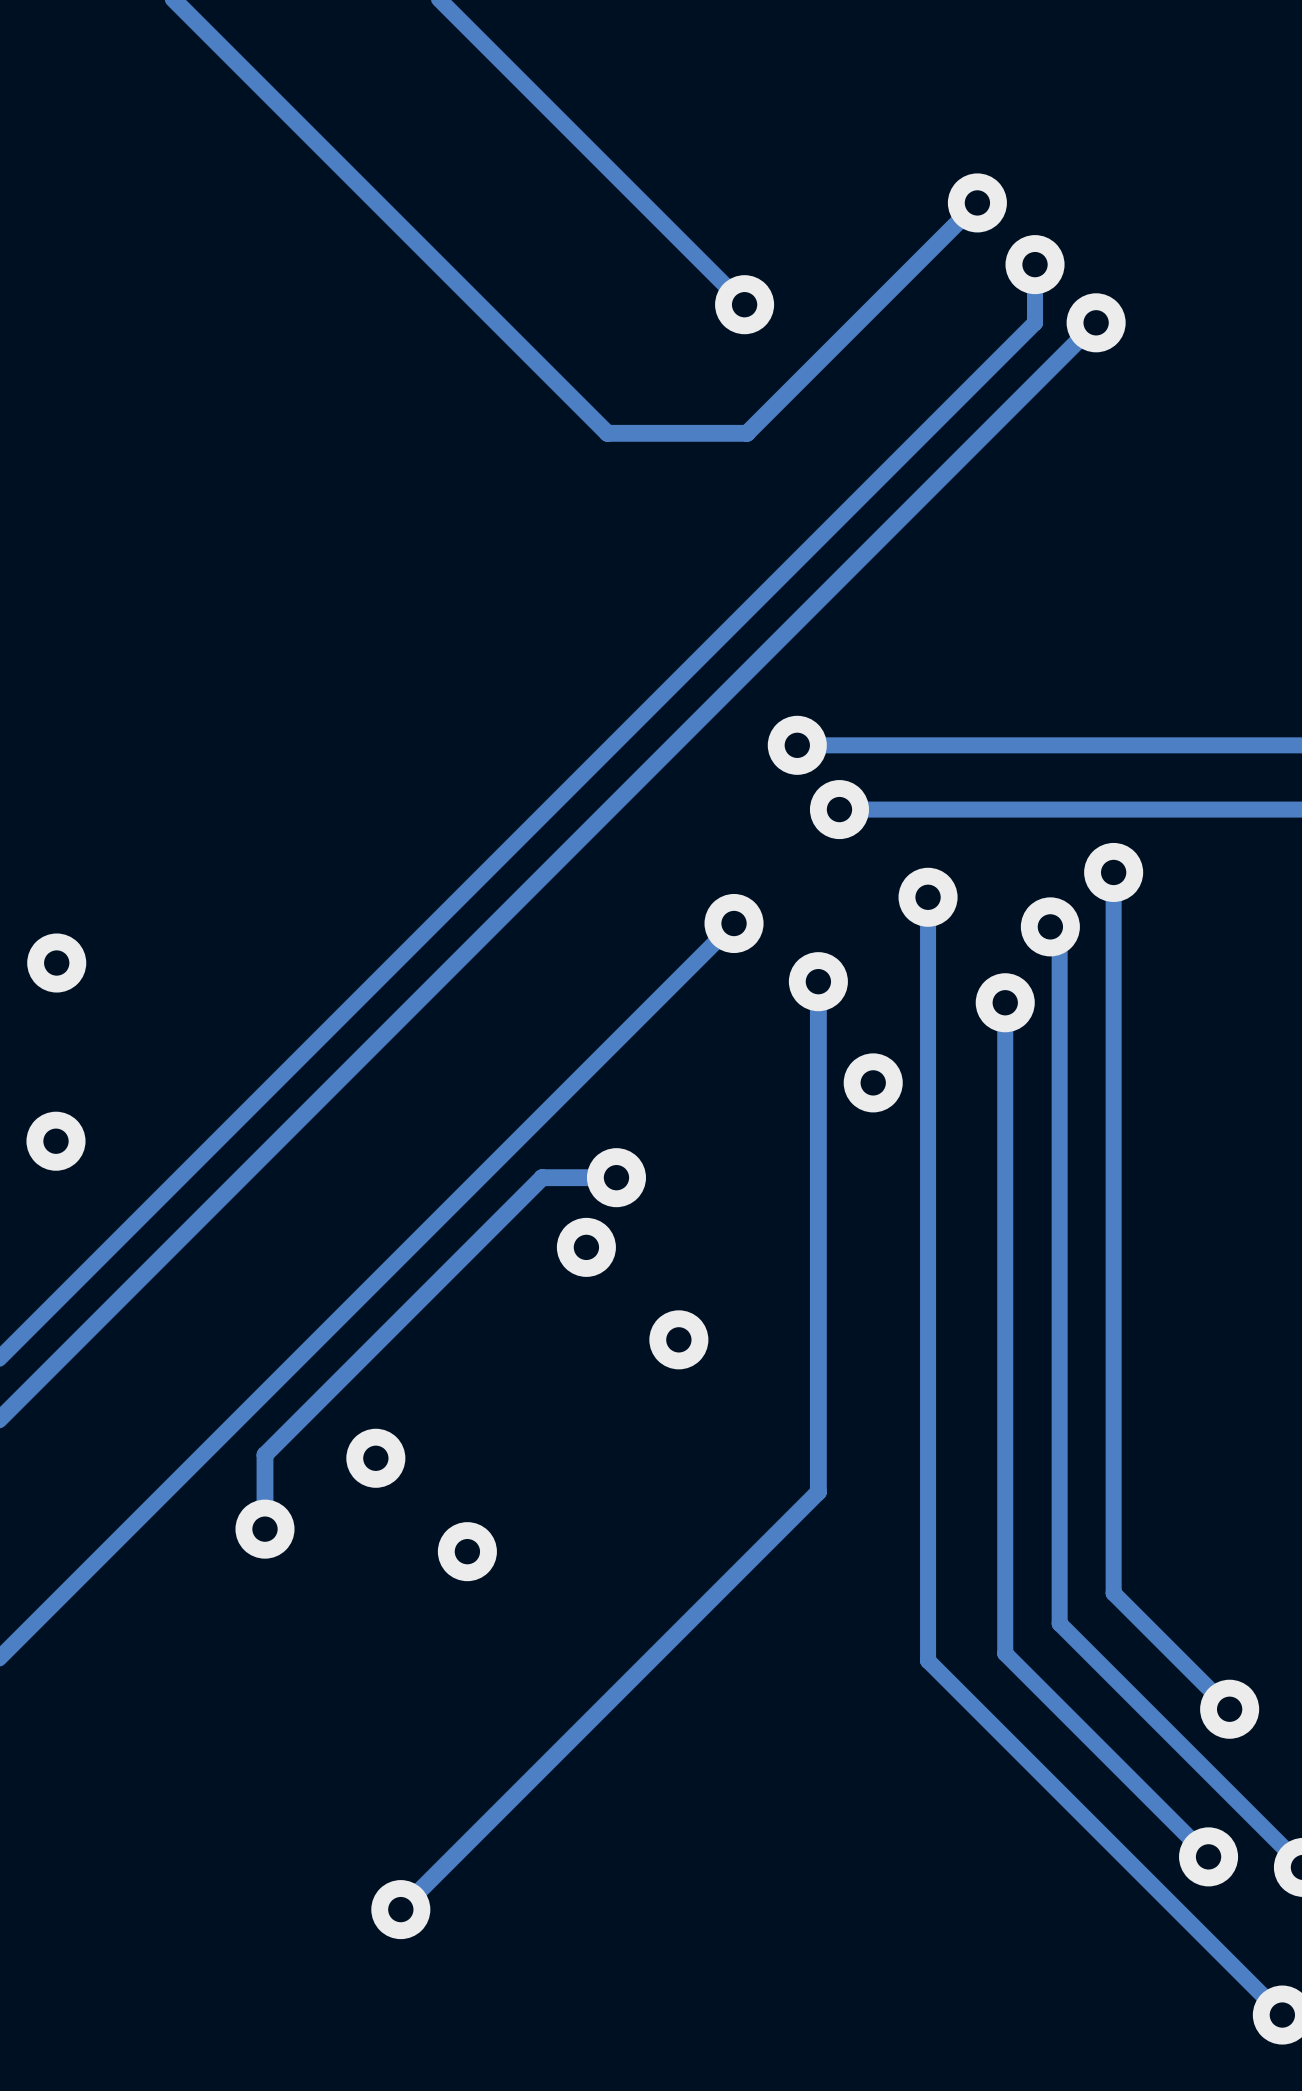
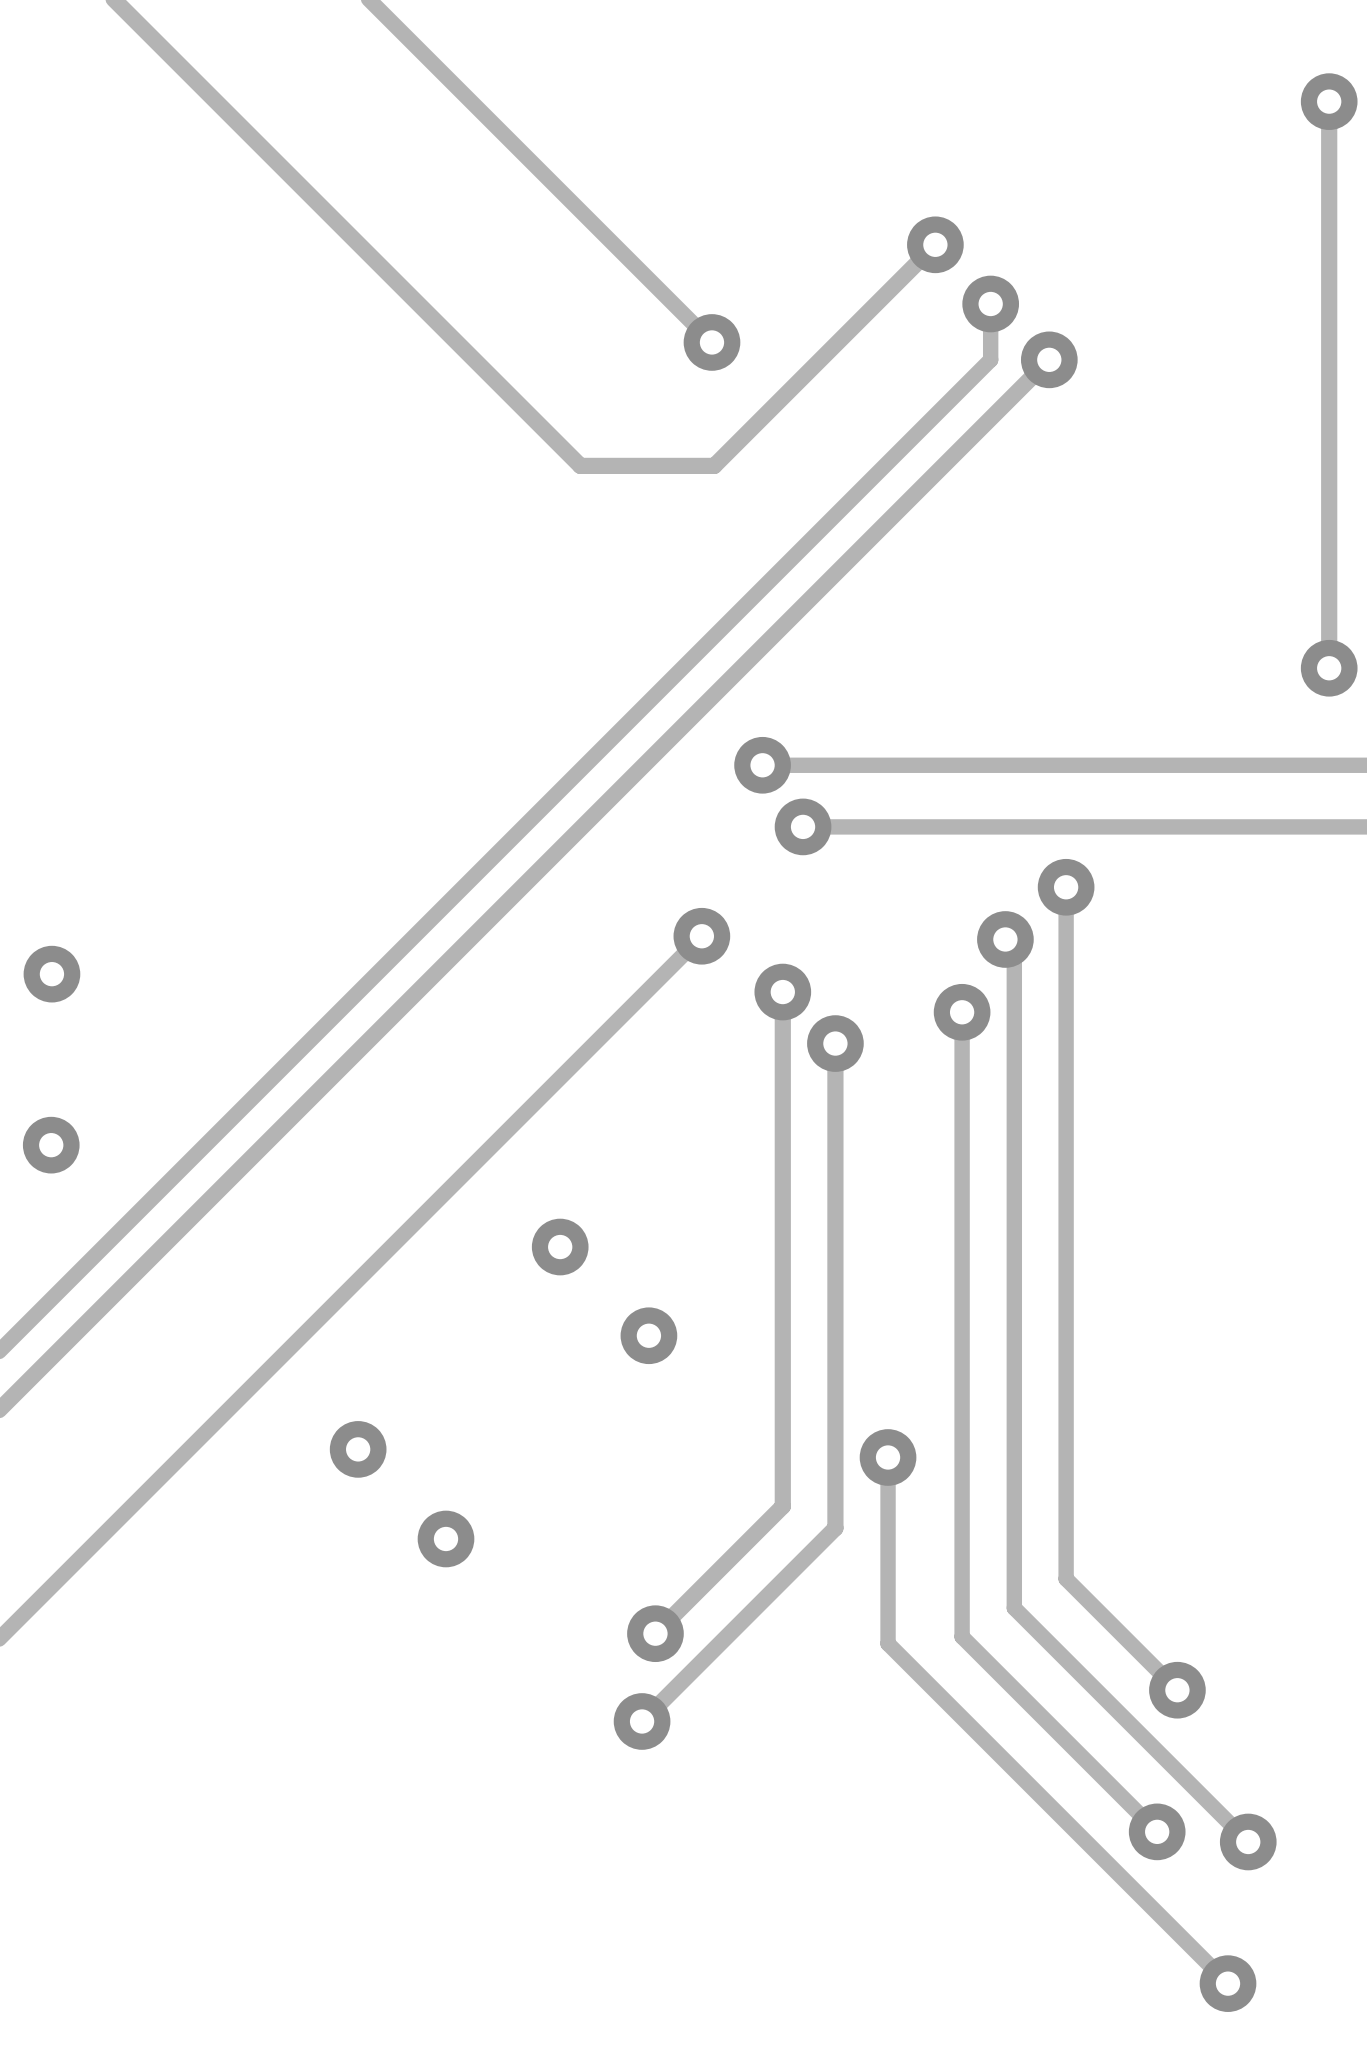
track: (928, 897) (928, 1466) -> none
via: (928, 897) -> none
track: none -> (835, 1043) (835, 1528) (642, 1721)
via position: (873, 1082) -> (835, 1043)
track: (616, 1177) (542, 1177) (265, 1454) (265, 1529) -> none
via: (616, 1177) -> none
via: none -> (888, 1457)
track: (818, 1492) (400, 1909) -> (782, 1481) (782, 1506) (655, 1633)
via: (265, 1529) -> none
via: none -> (655, 1633)
via: none -> (642, 1721)
via: (400, 1909) -> none

